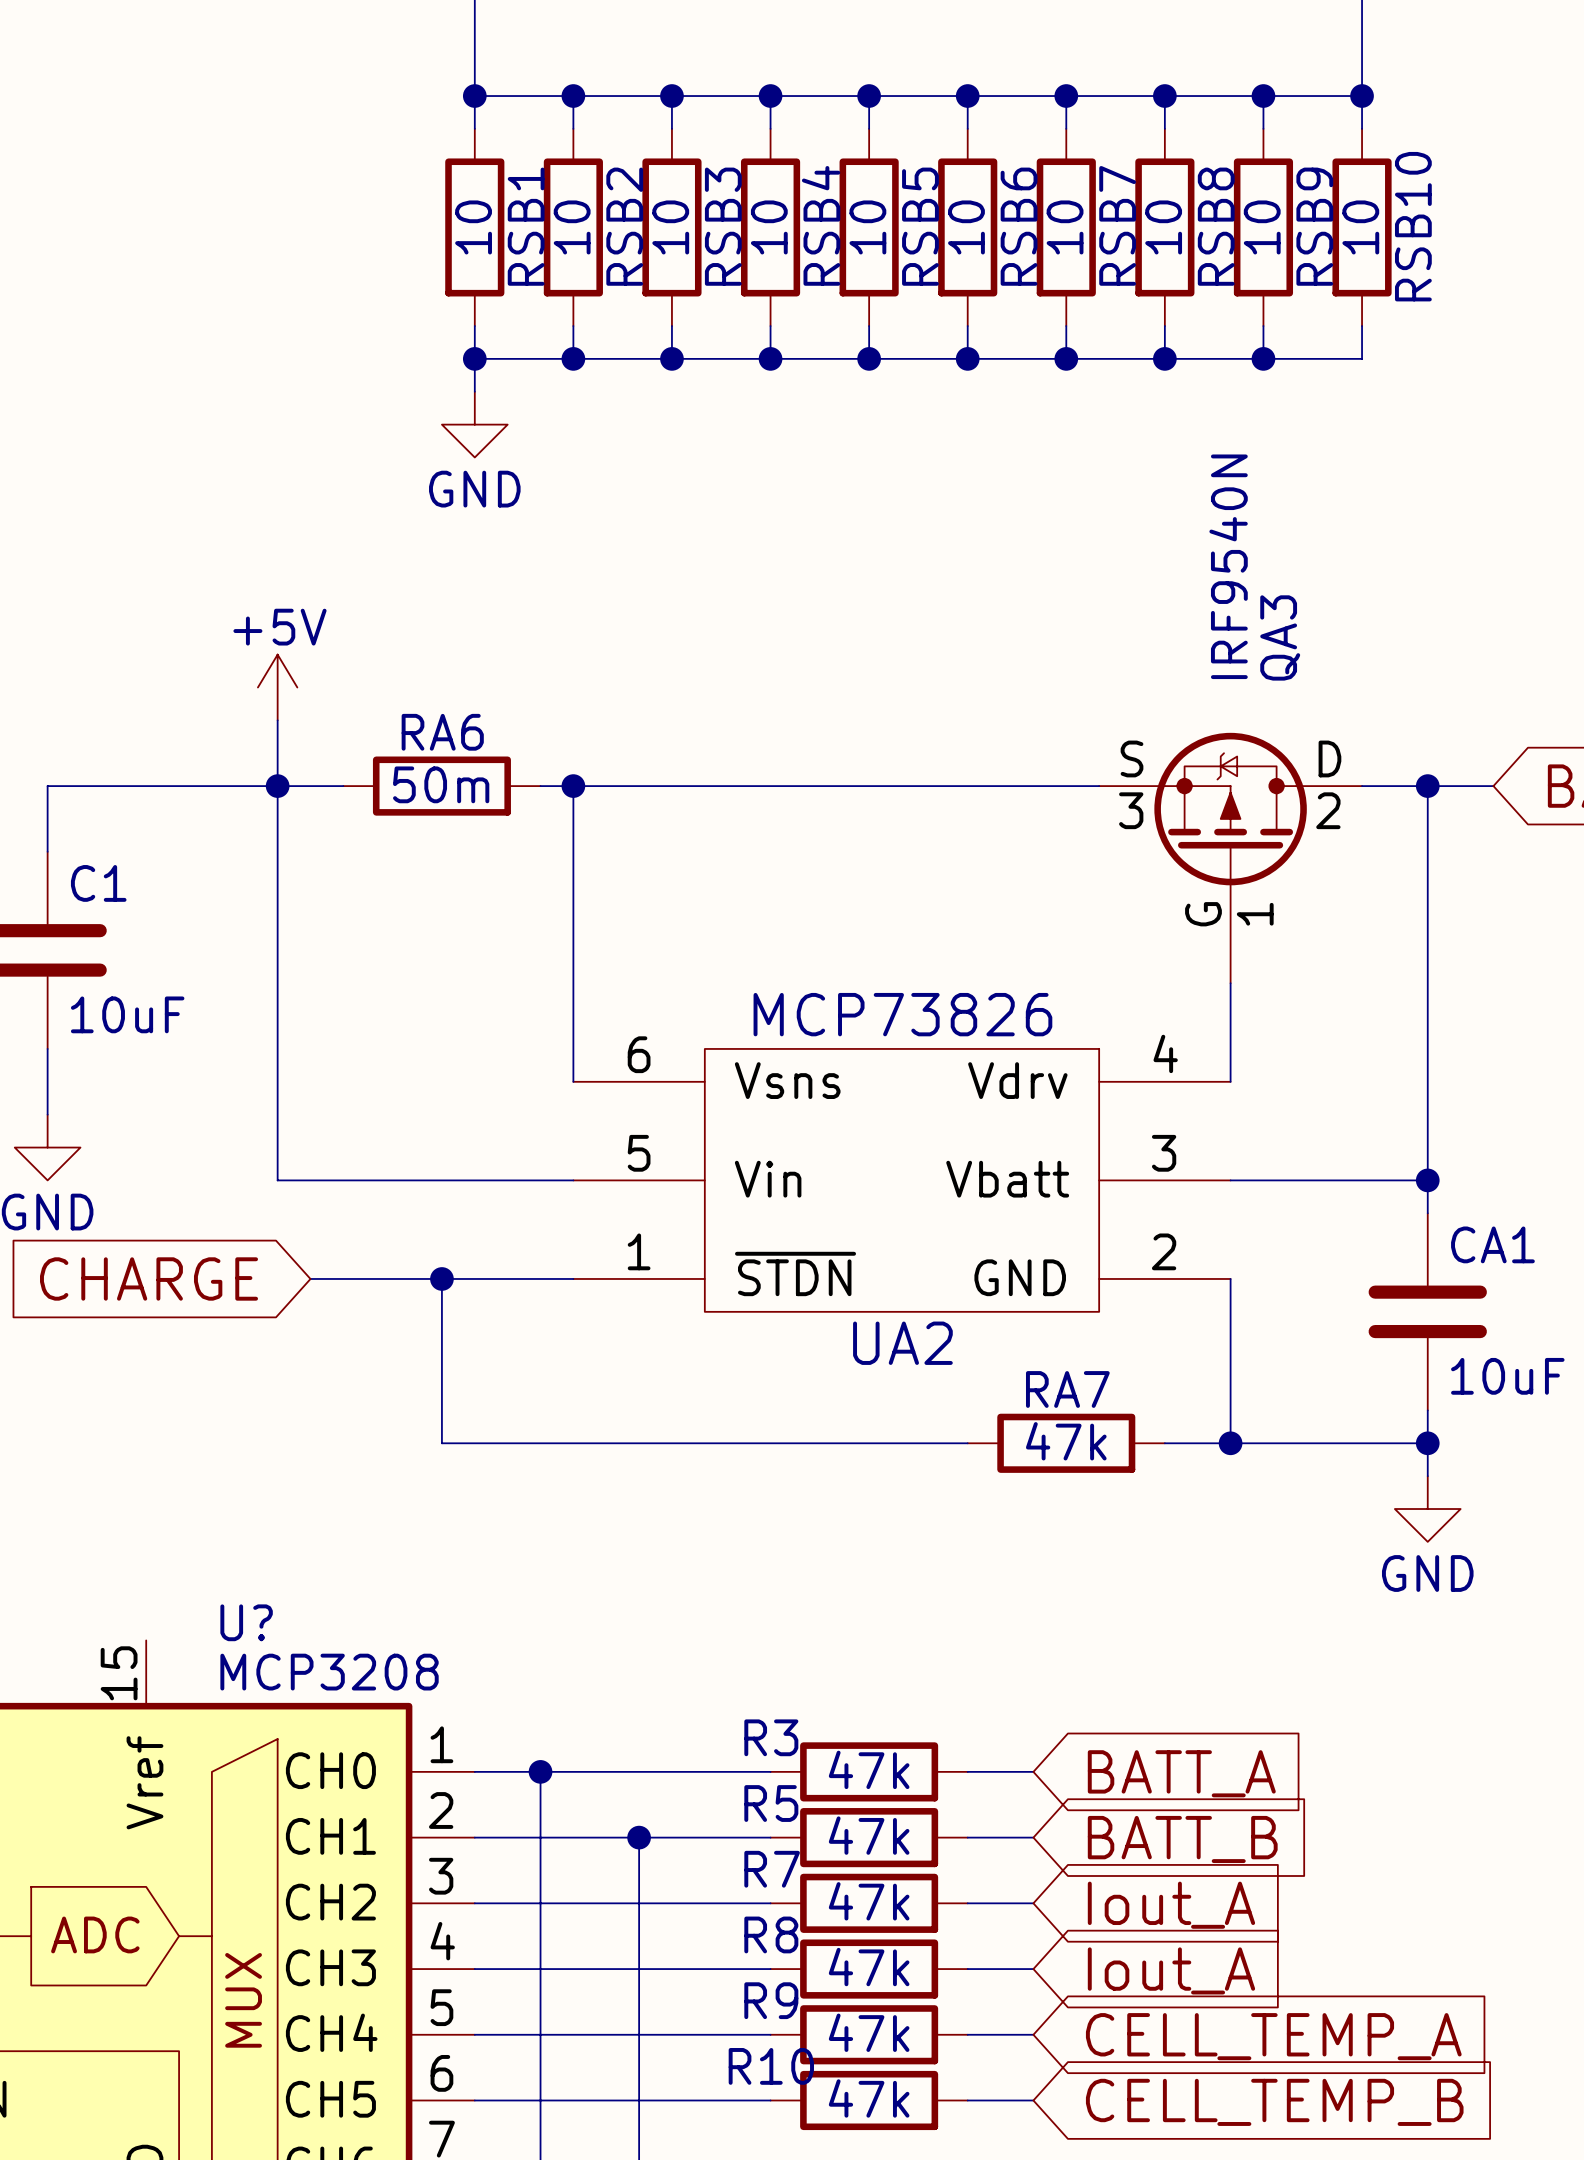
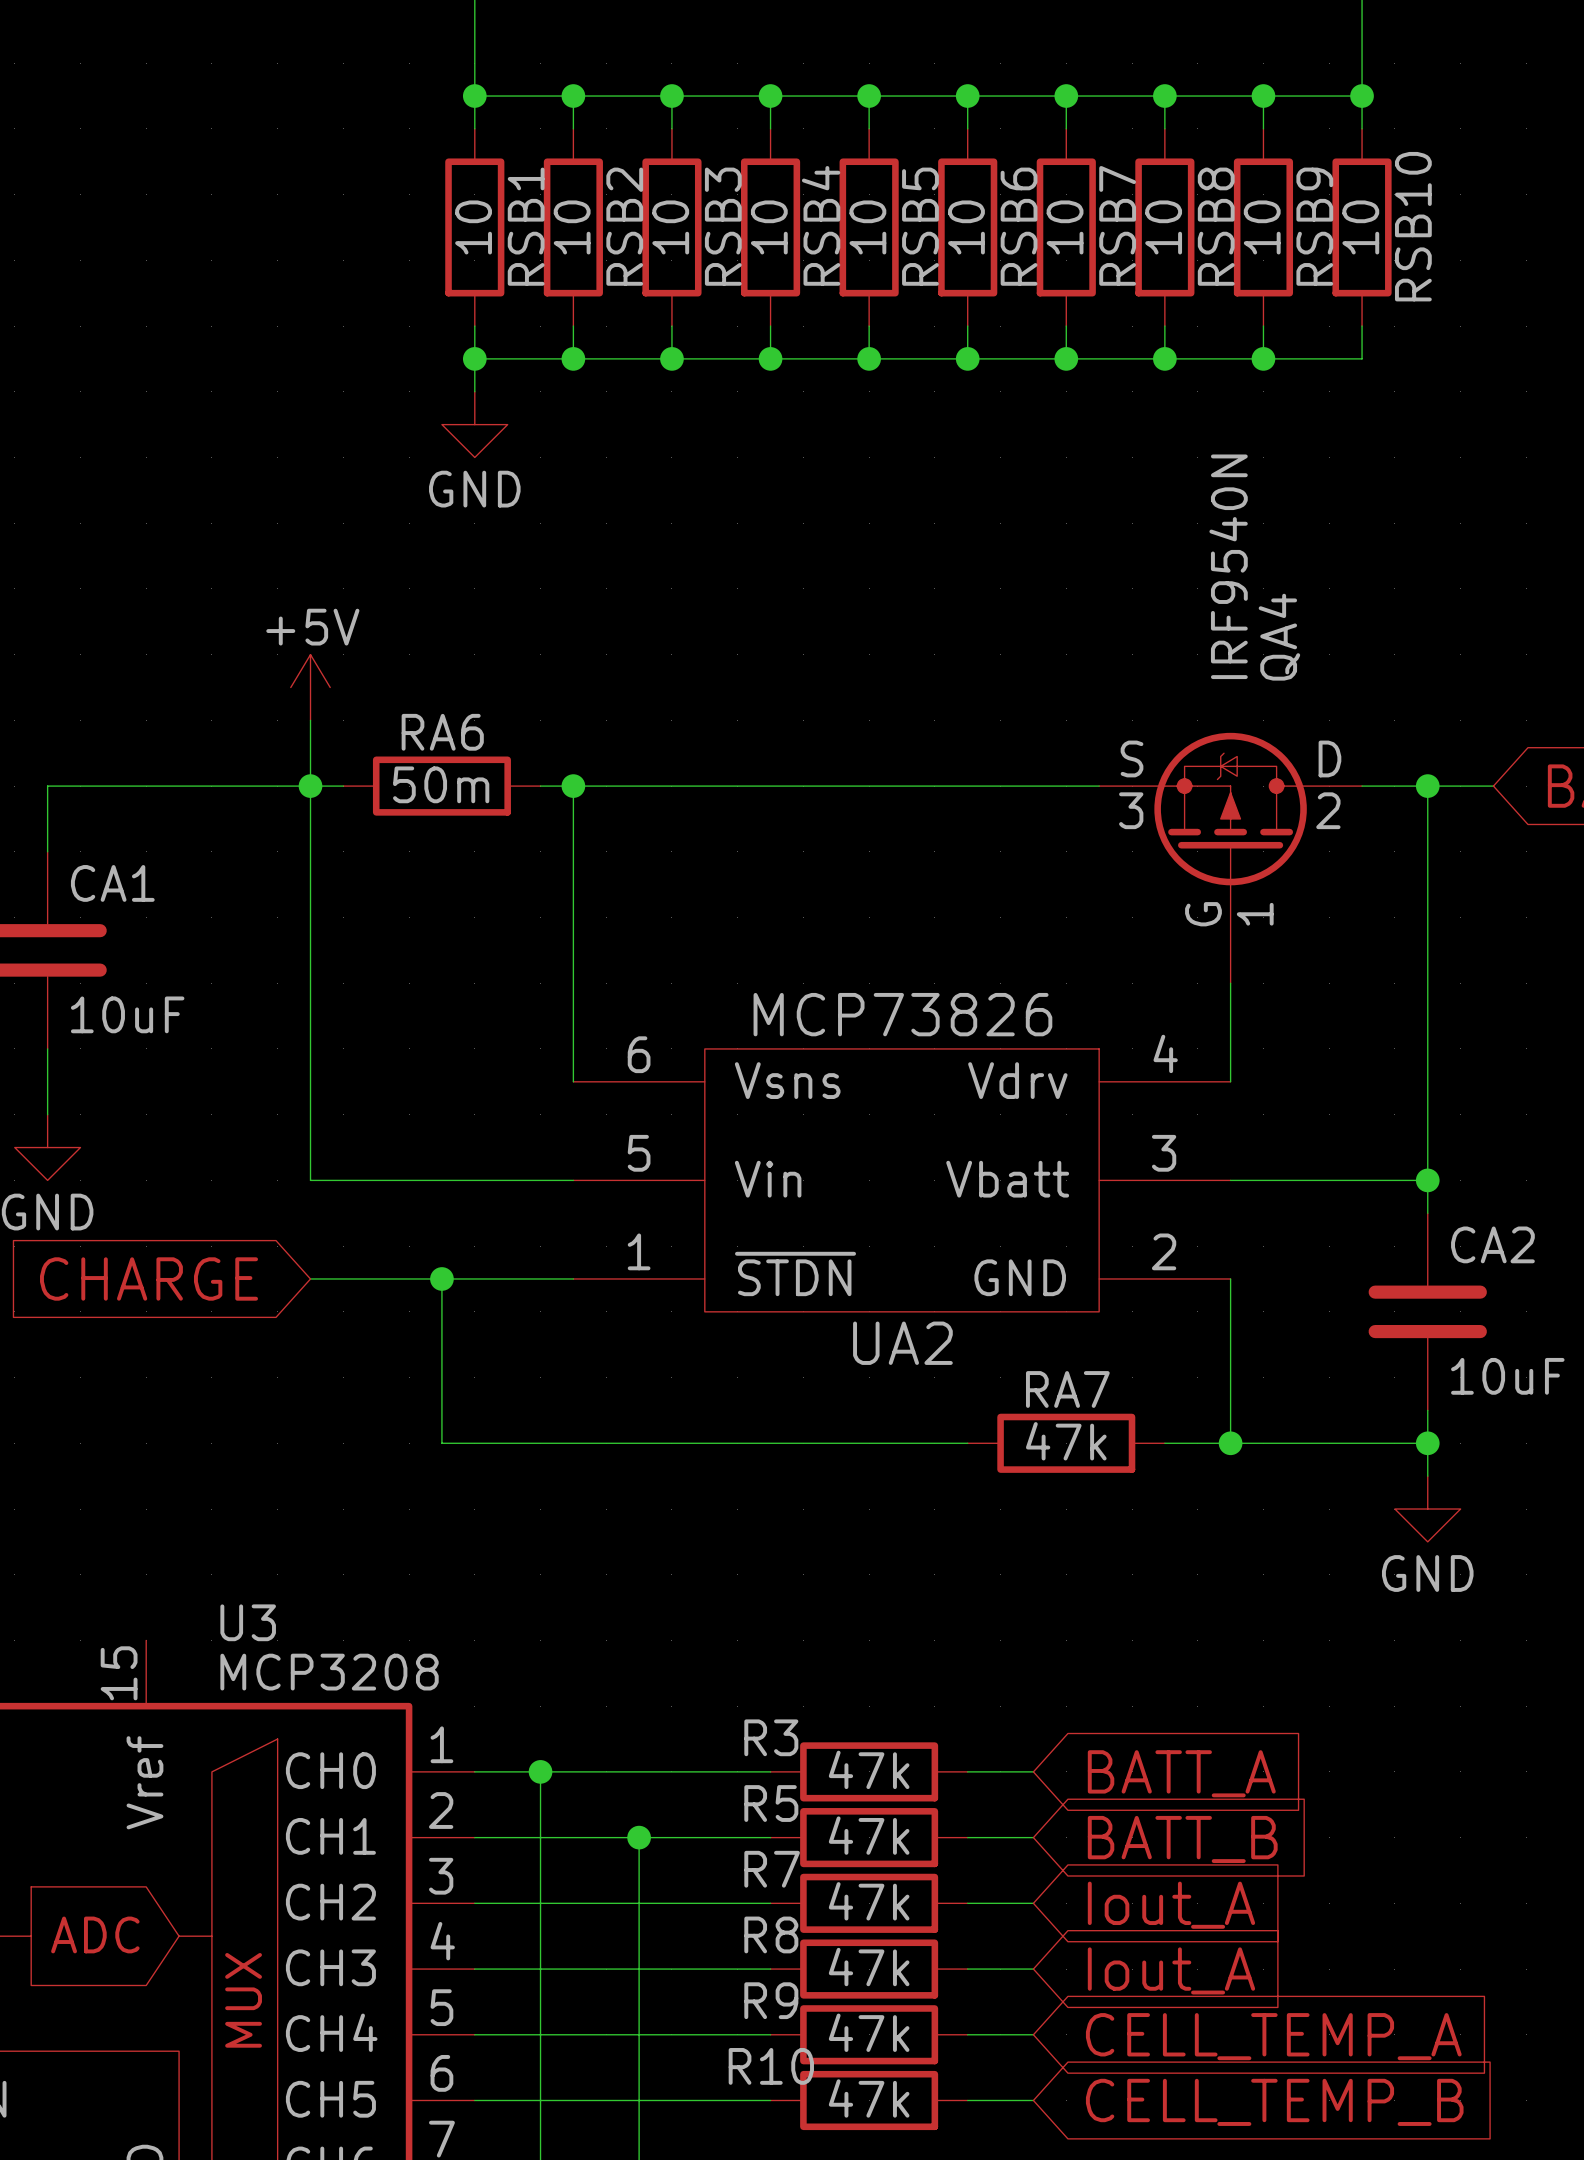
QA3 name: QA3 (1280, 637) -> QA4 (1279, 637)
power symbol position: +5V (277, 687) -> +5V (310, 687)
wire: (277, 720) (277, 1180) (310, 1180) -> (310, 720) (310, 1180)
junction position: (277, 786) -> (310, 786)
C1 name: C1 (98, 883) -> CA1 (112, 883)
CA1 name: CA1 (1492, 1244) -> CA2 (1492, 1244)
U? name: U? (246, 1622) -> U3 (248, 1622)

